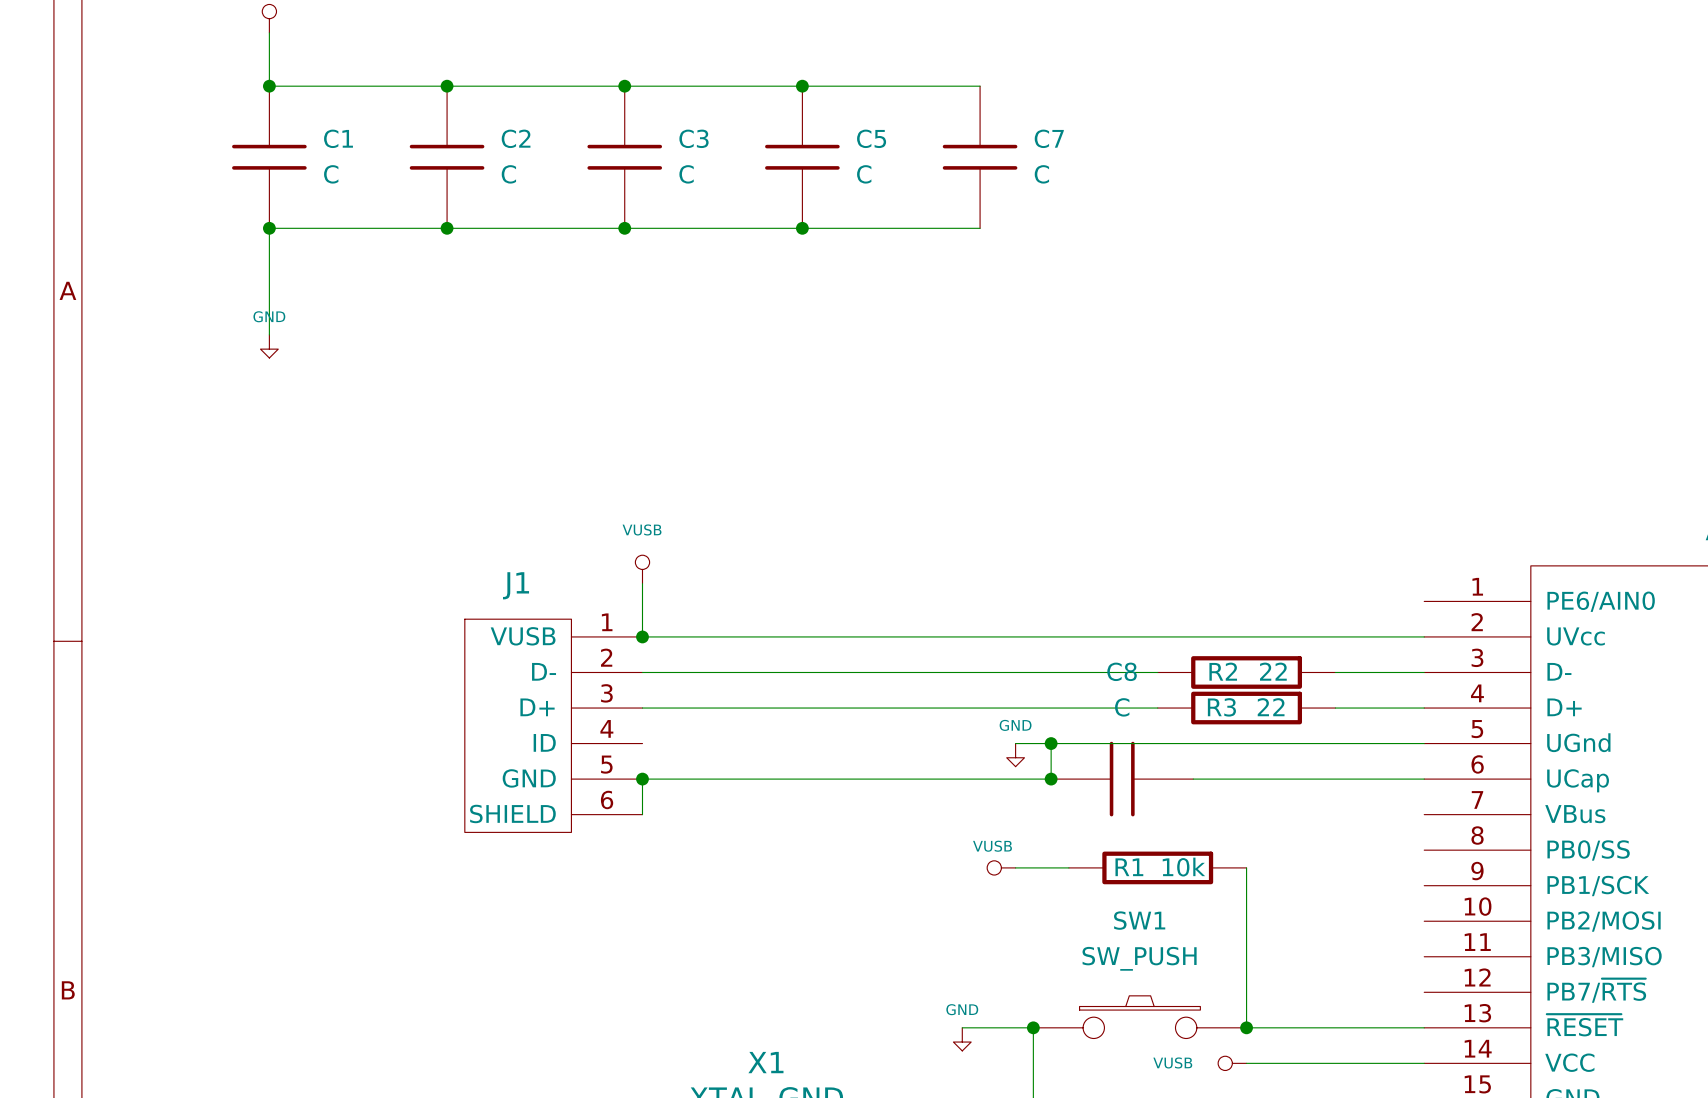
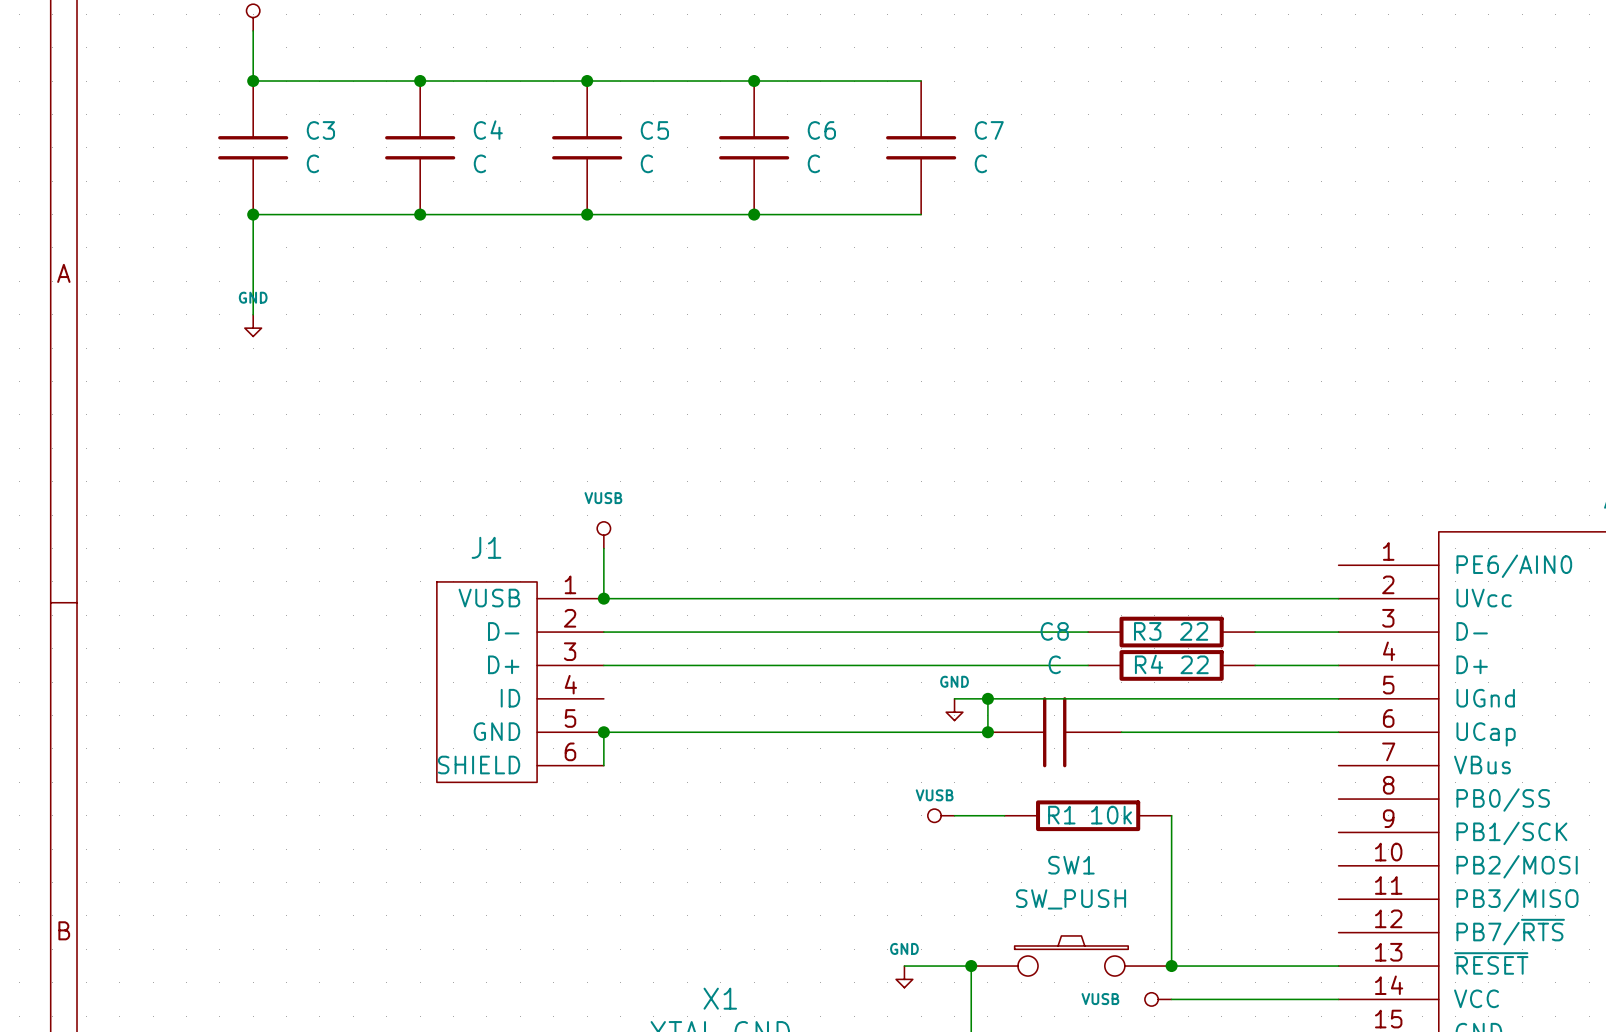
C1 name: C1 (338, 138) -> C3 (320, 130)
C2 name: C2 (516, 138) -> C4 (488, 130)
C3 name: C3 (693, 138) -> C5 (654, 130)
C5 name: C5 (871, 138) -> C6 (821, 130)
R2 name: R2 (1223, 671) -> R3 (1147, 631)
R3 name: R3 (1221, 707) -> R4 (1149, 664)

